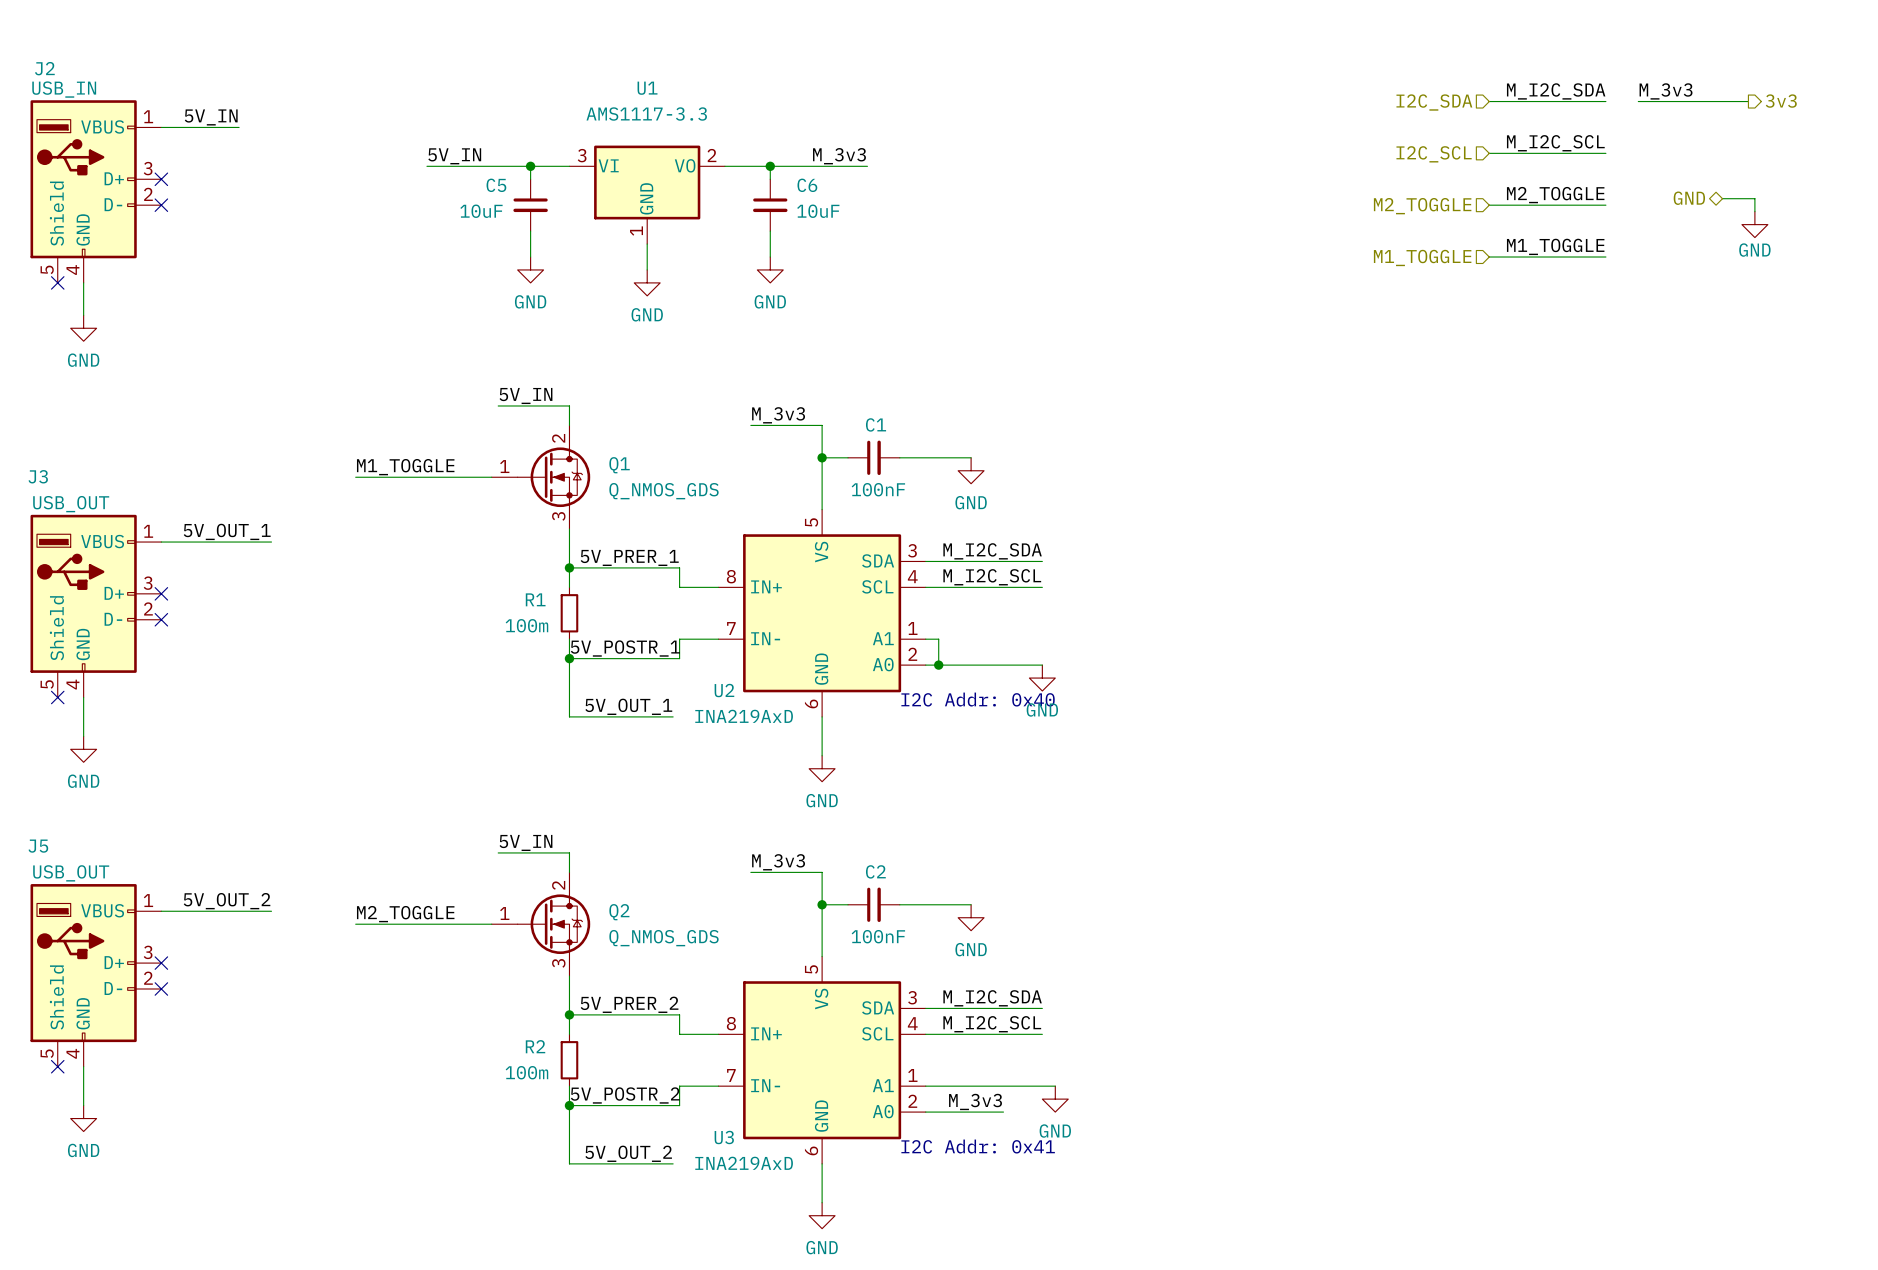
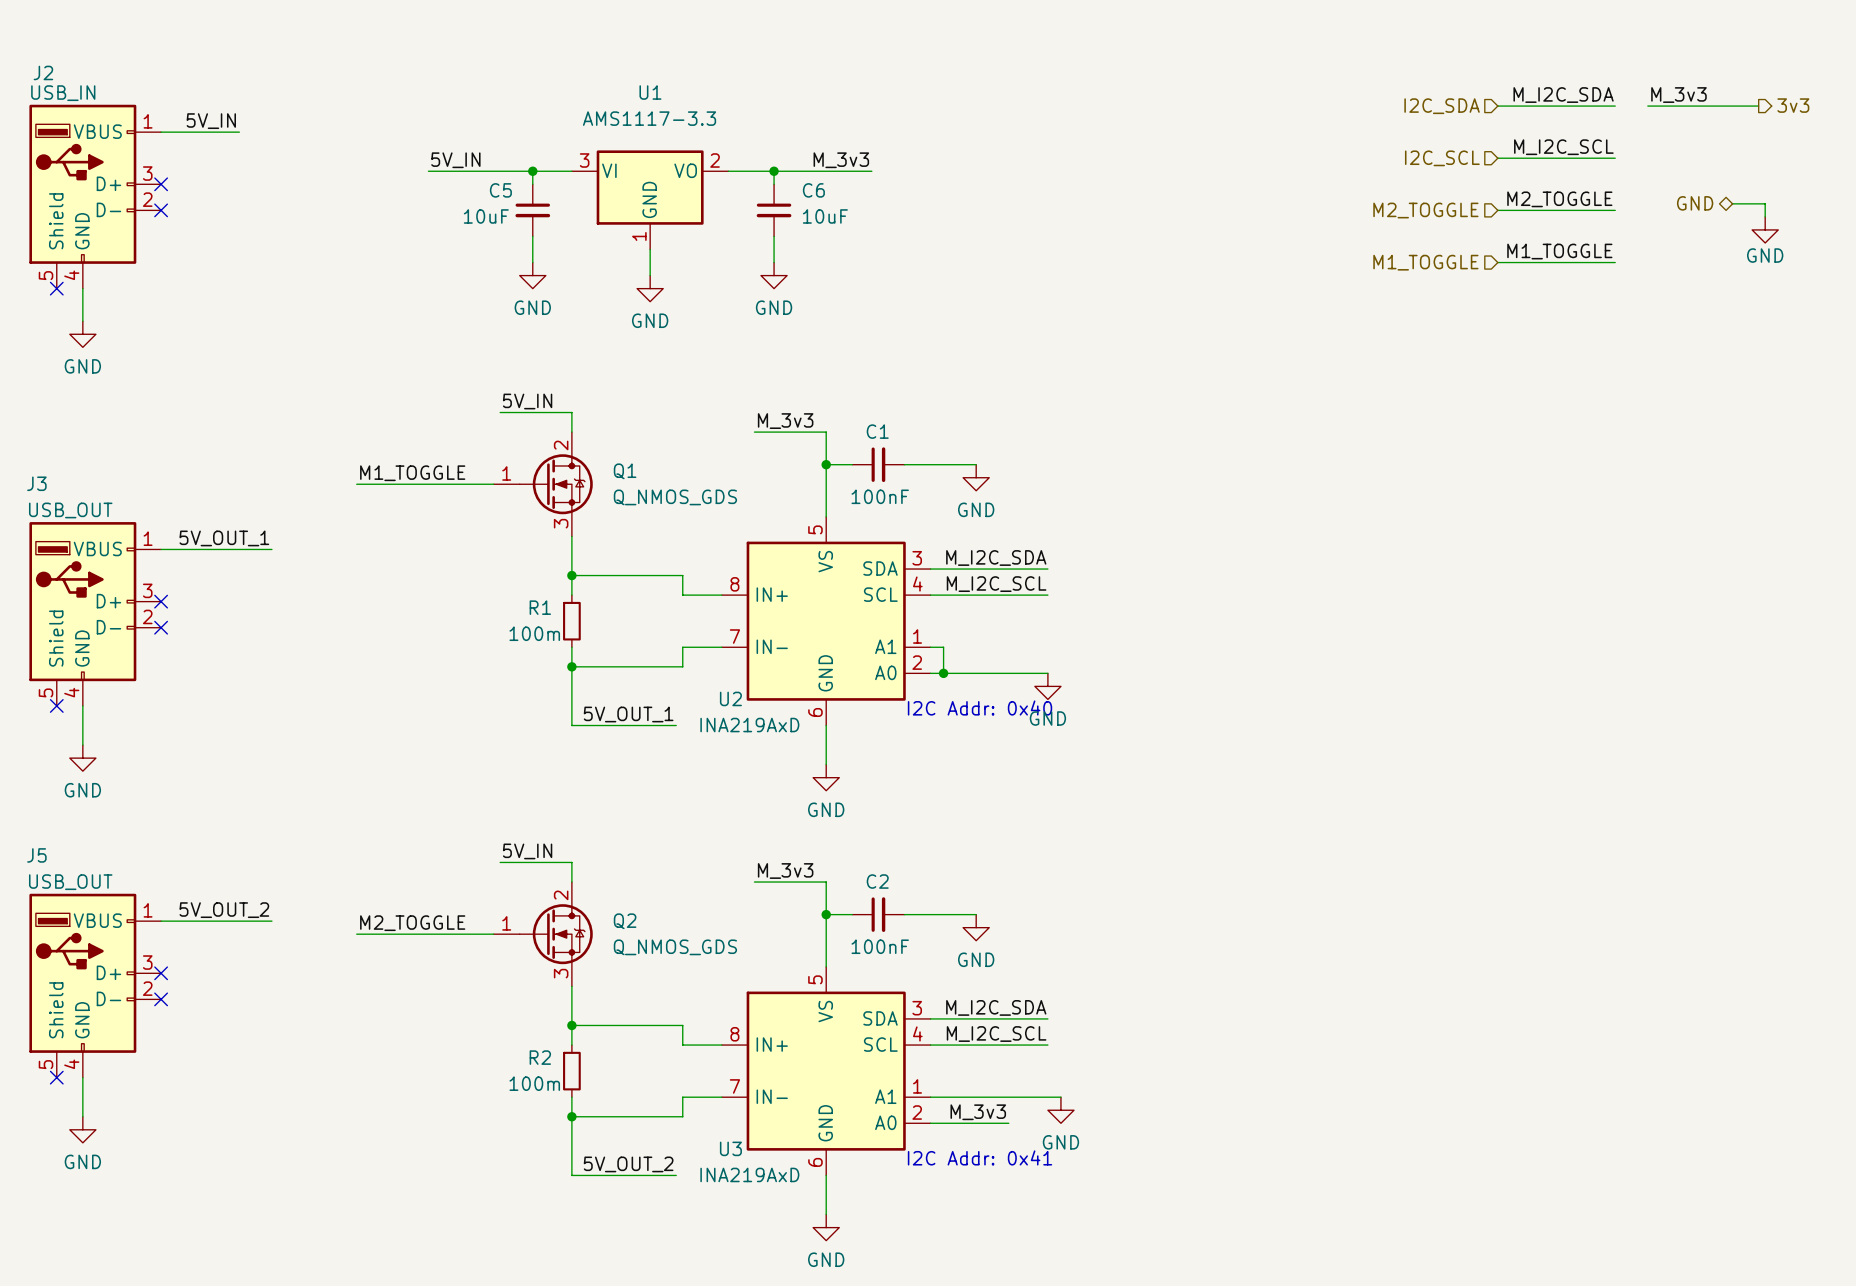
label: 5V_PRER_1 (629, 557) -> none
label: 5V_POSTR_1 (625, 648) -> none
label: 5V_PRER_2 (629, 1004) -> none
label: 5V_POSTR_2 (625, 1095) -> none

